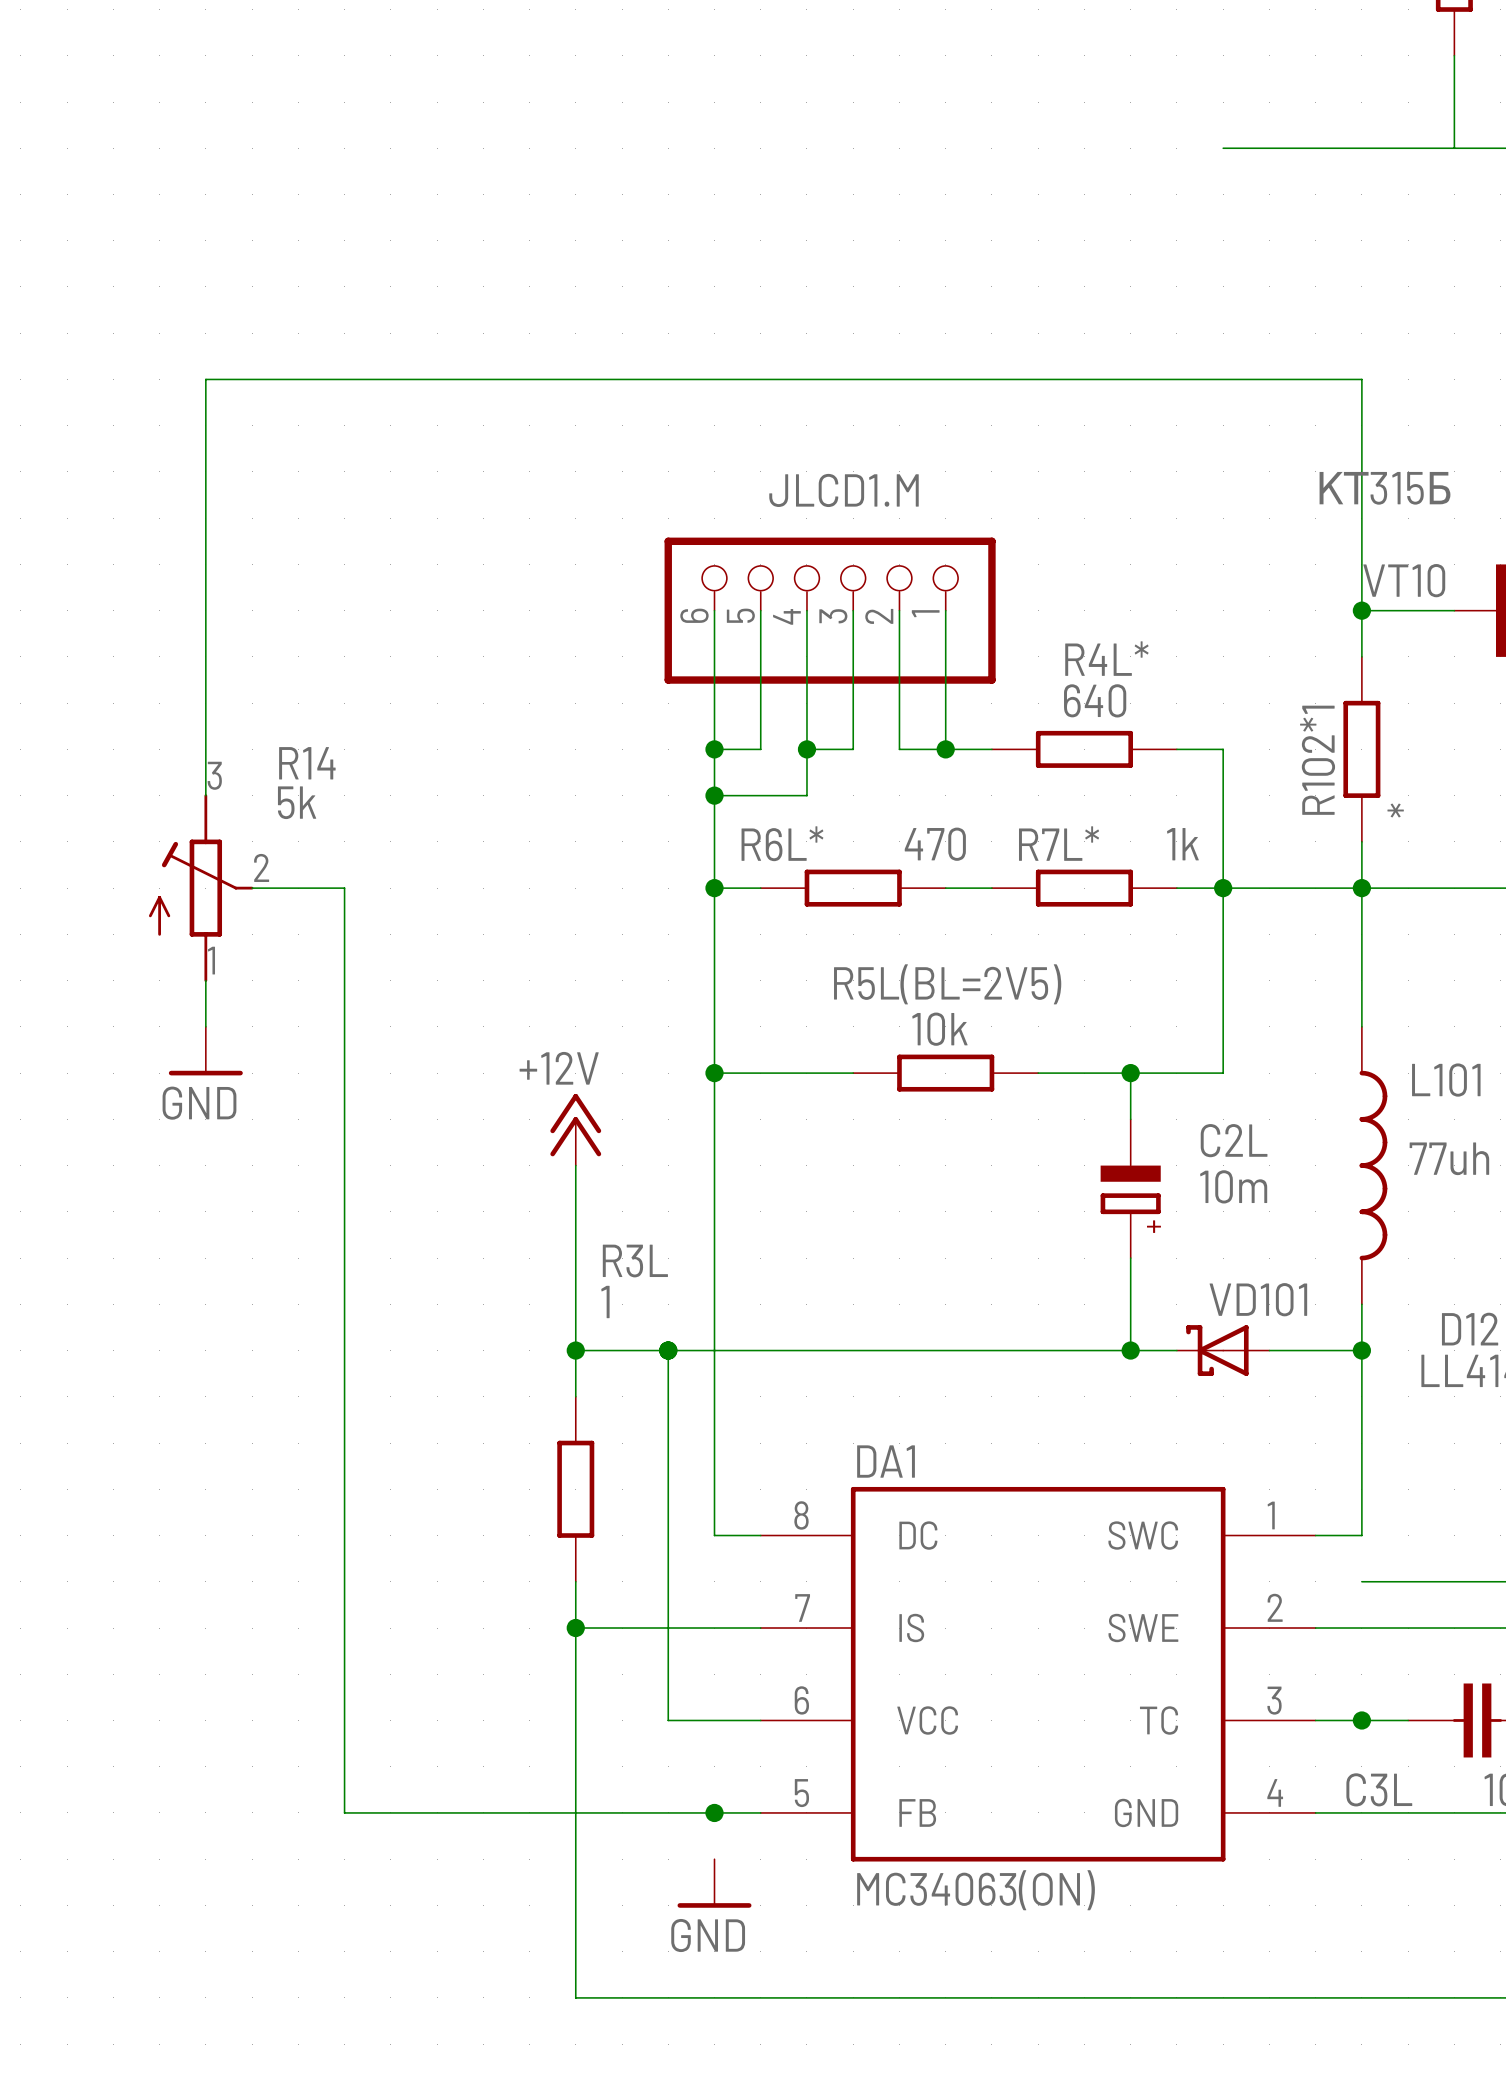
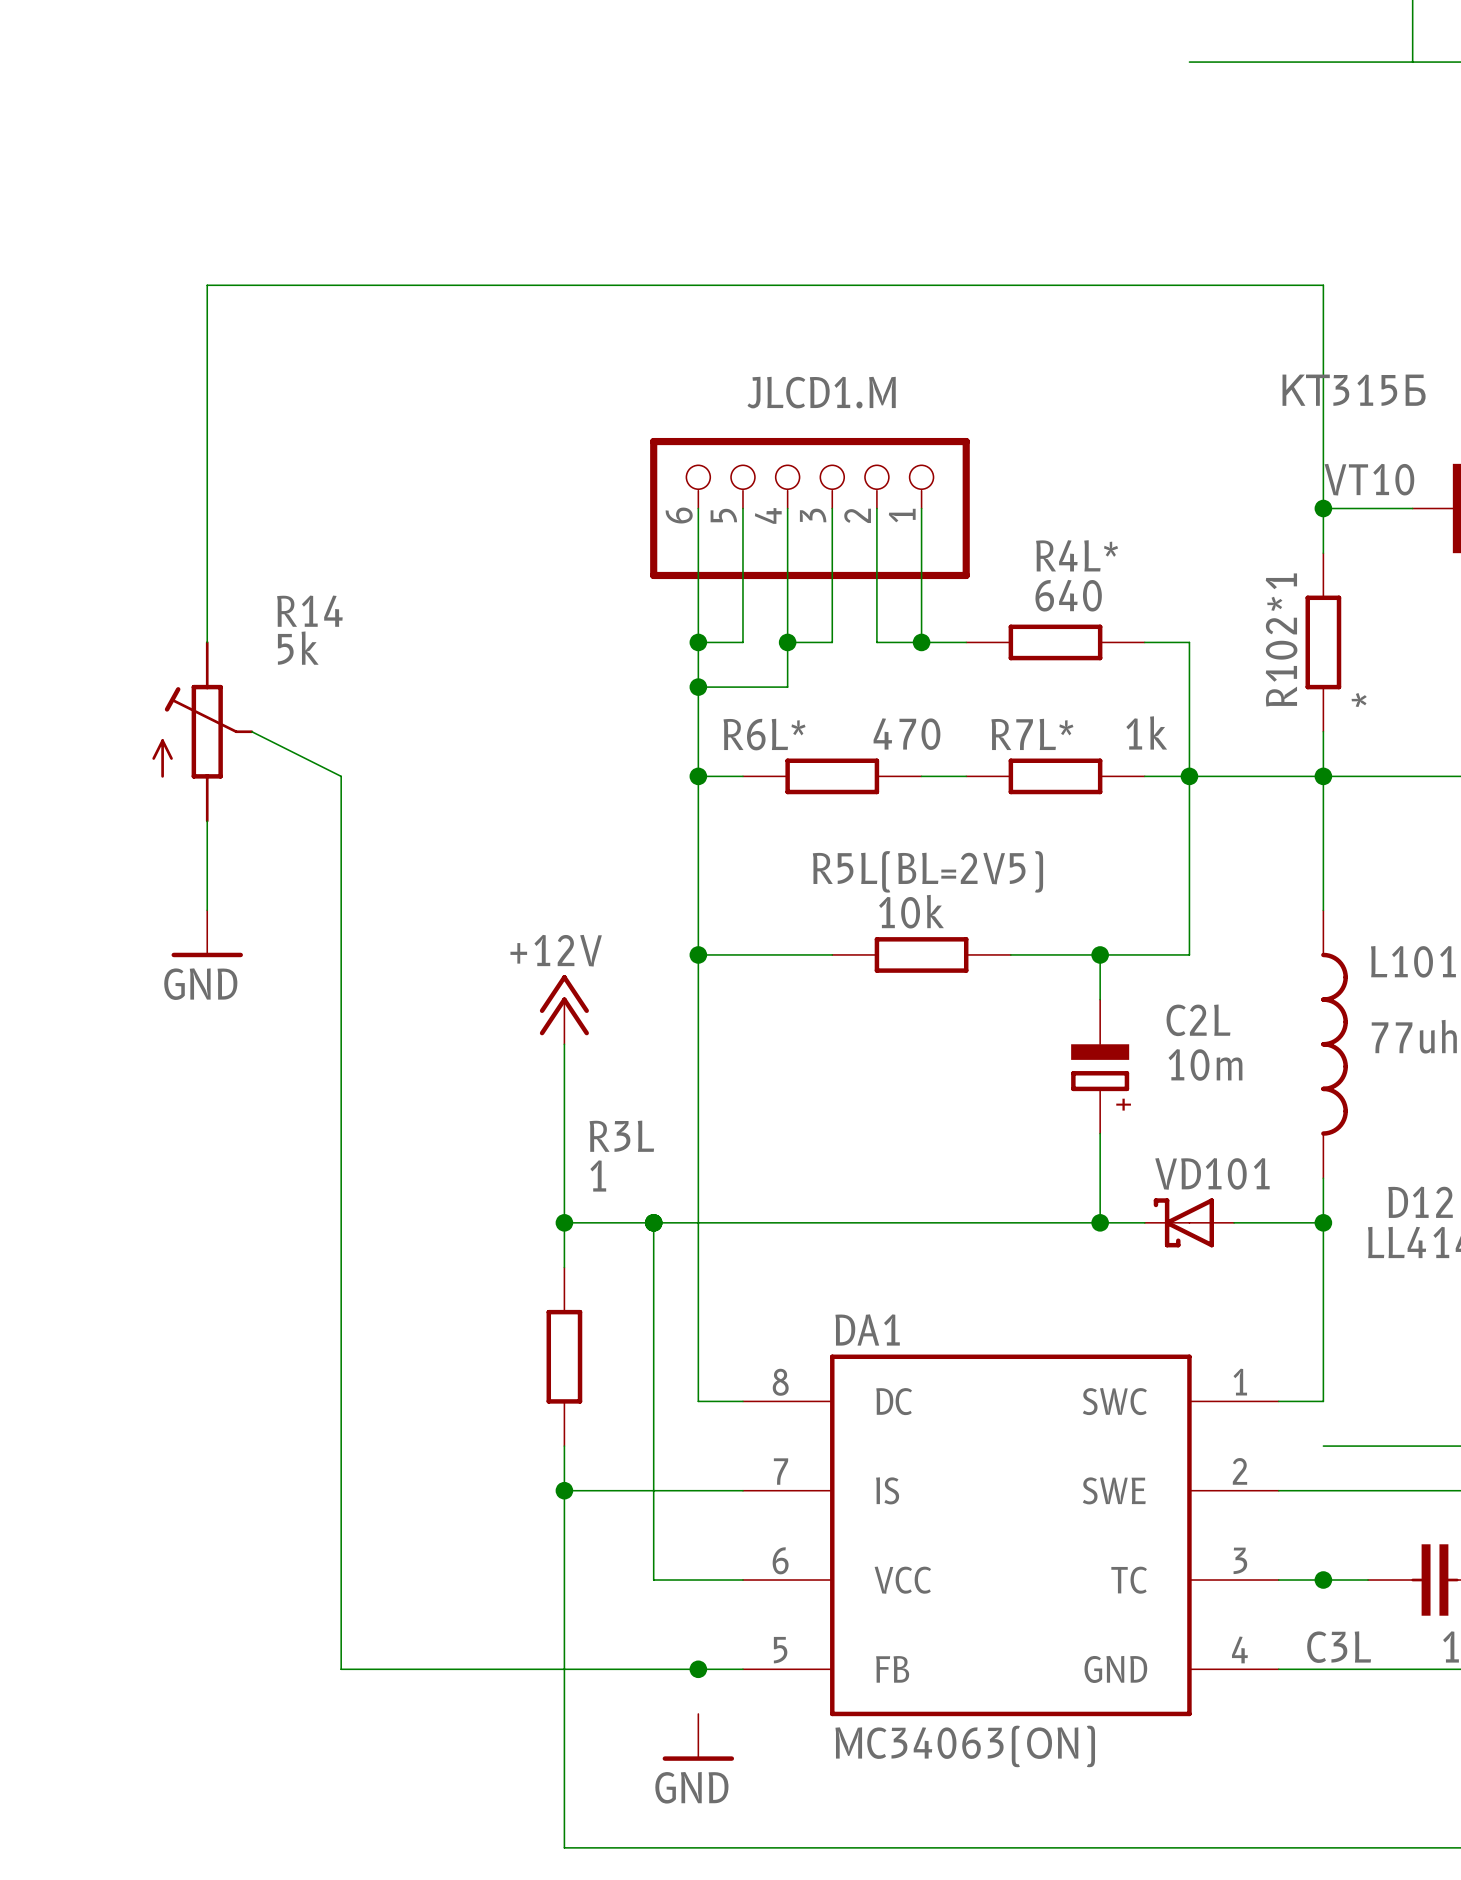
R14 pin number: 3 (214, 775) -> none
R14 pin number: 2 (261, 867) -> none
R14 position: (201, 888) -> (202, 731)
wire: (252, 888) (344, 888) -> (251, 731) (341, 776)
R14 pin number: 1 (211, 960) -> none

